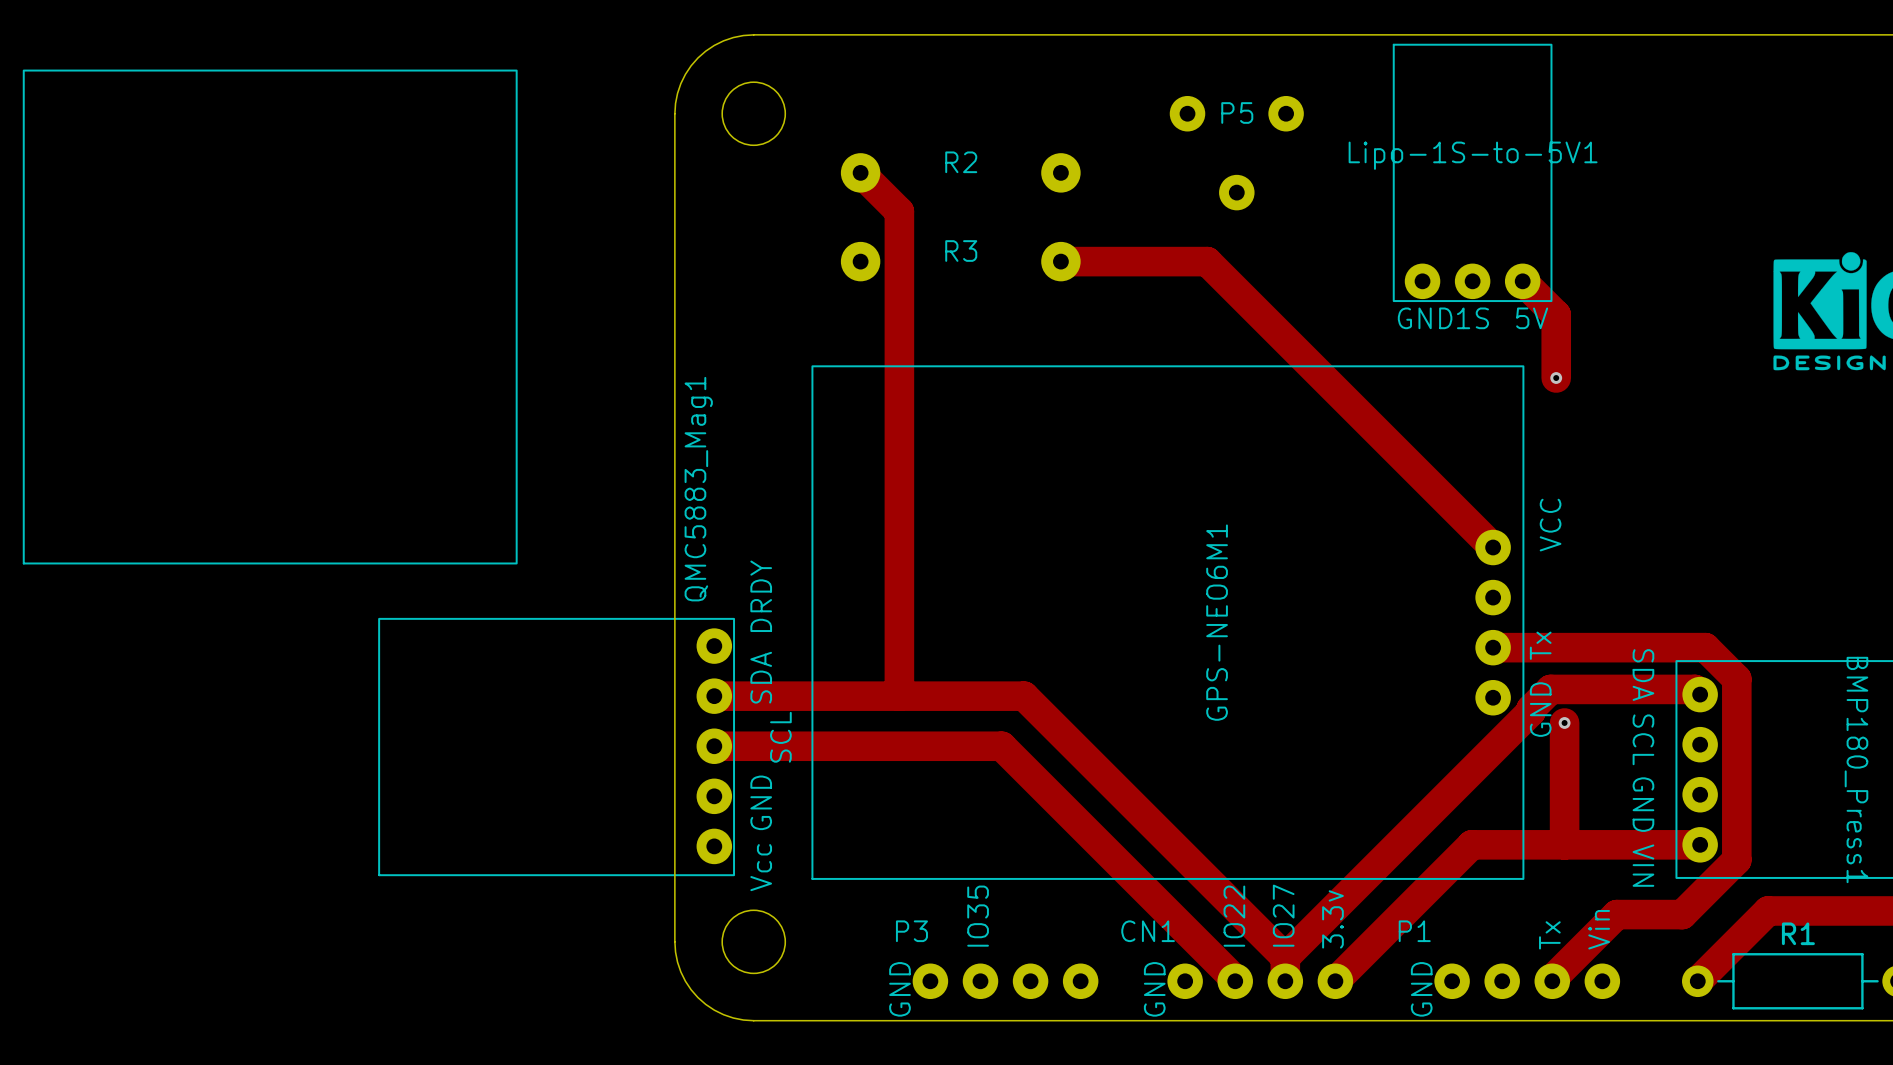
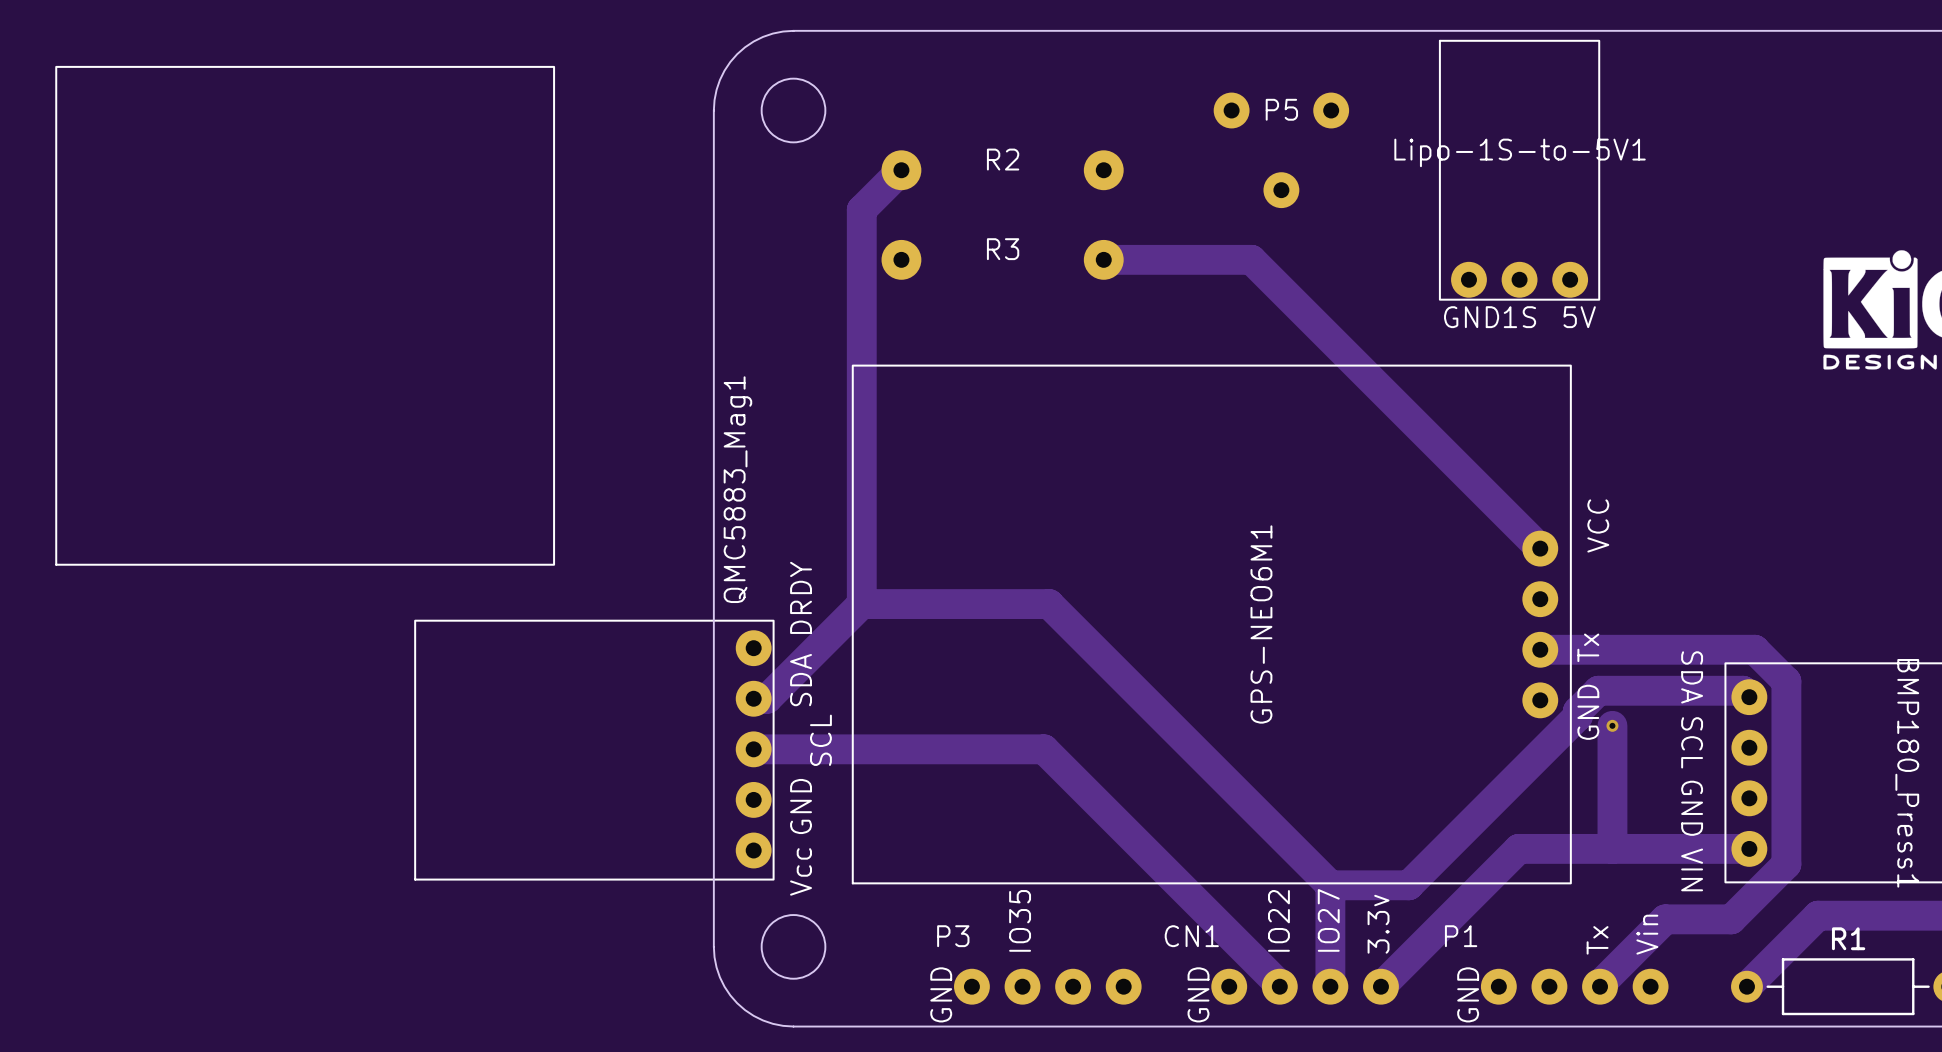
track: (860, 172) (899, 211) (899, 696) -> (901, 170) (861, 209) (861, 604)
track: (1522, 281) (1556, 314) (1556, 378) -> none
via: (1556, 378) -> none
track: none -> (861, 604) (1049, 604) (1330, 885)
track: none -> (861, 604) (767, 698)
track: (1694, 689) (1550, 689) (1531, 709) (1531, 711) (1285, 957) (1024, 696) (727, 696) -> (1744, 691) (1598, 690) (1577, 711) (1577, 716) (1408, 885) (1330, 885)
track: none -> (1330, 885) (1330, 962)

